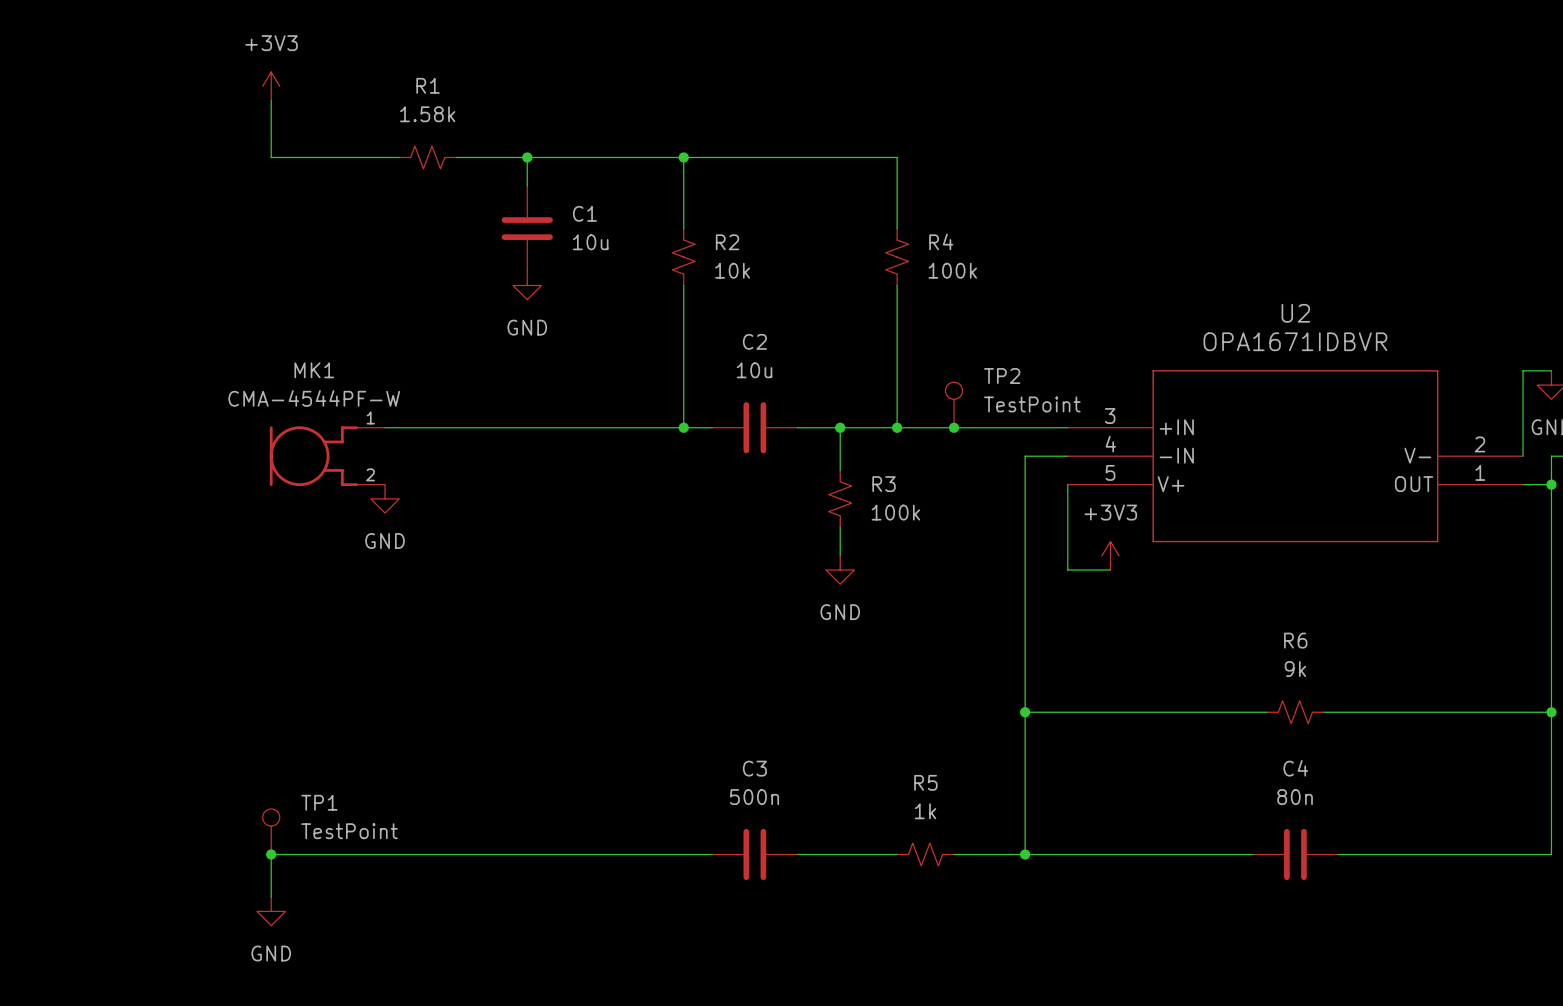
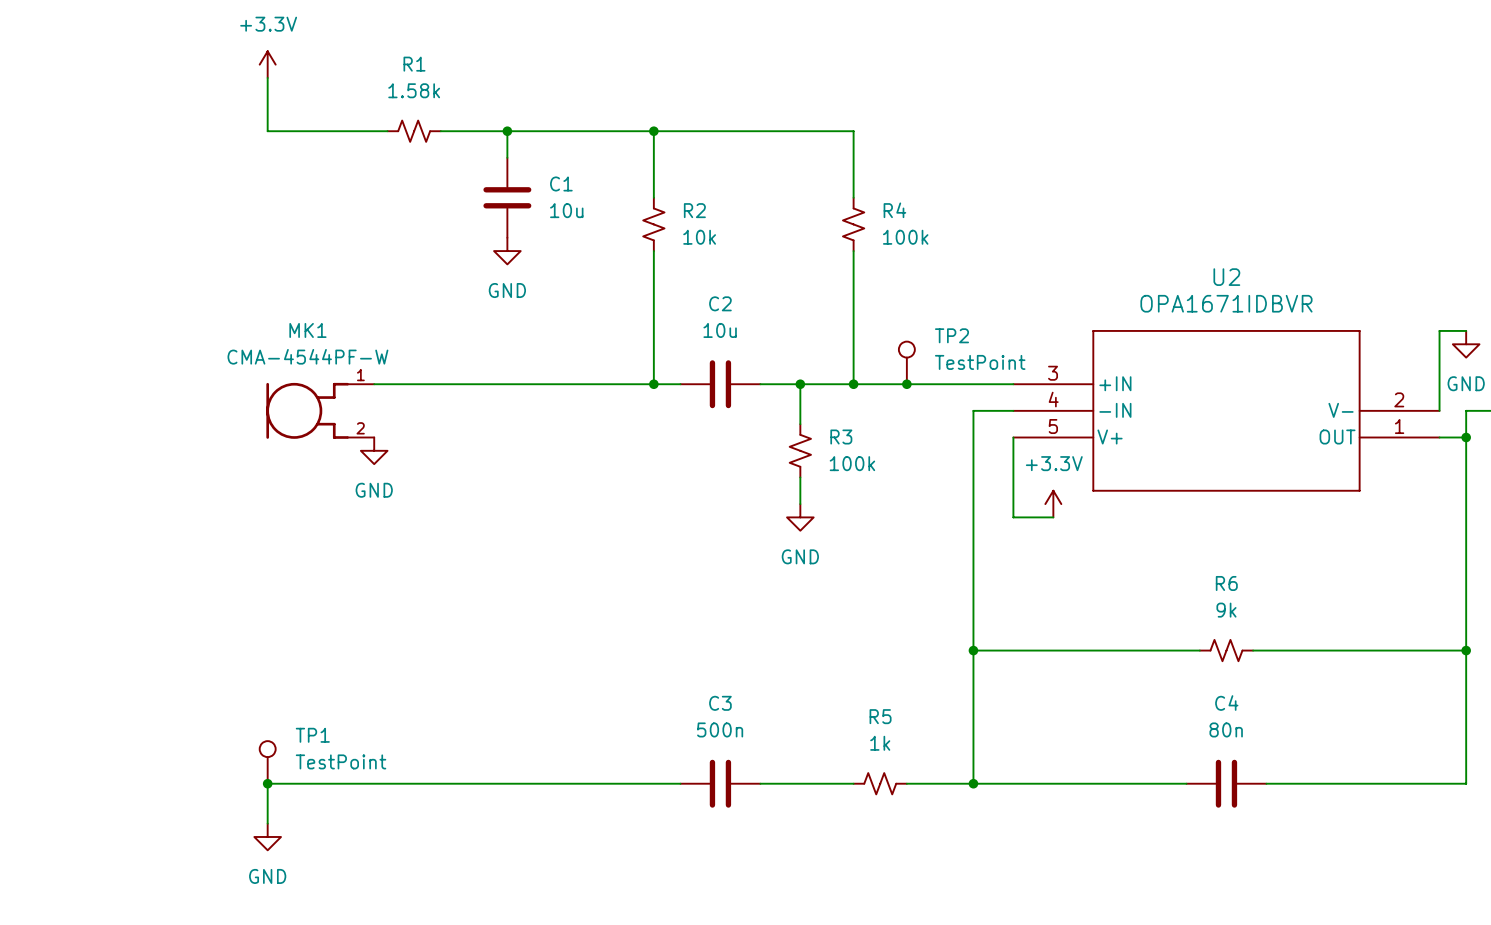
power symbol: +3V3 (271, 86) -> +3.3V (267, 64)
power symbol: +3V3 (1110, 555) -> +3.3V (1053, 504)

